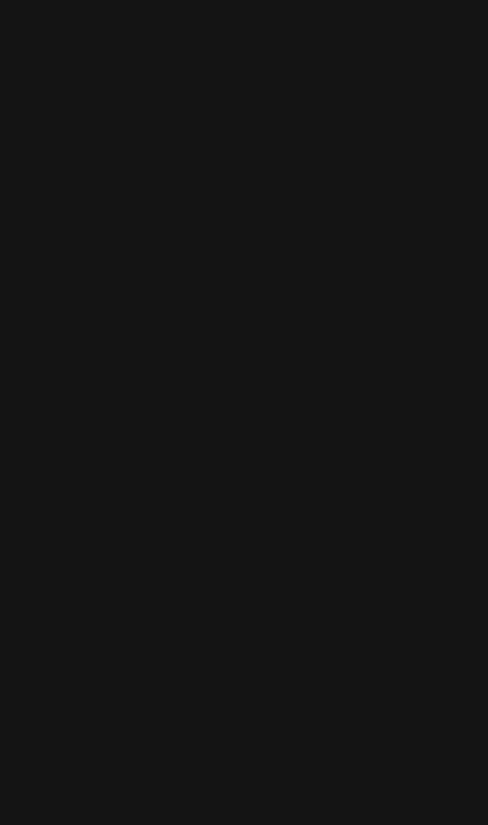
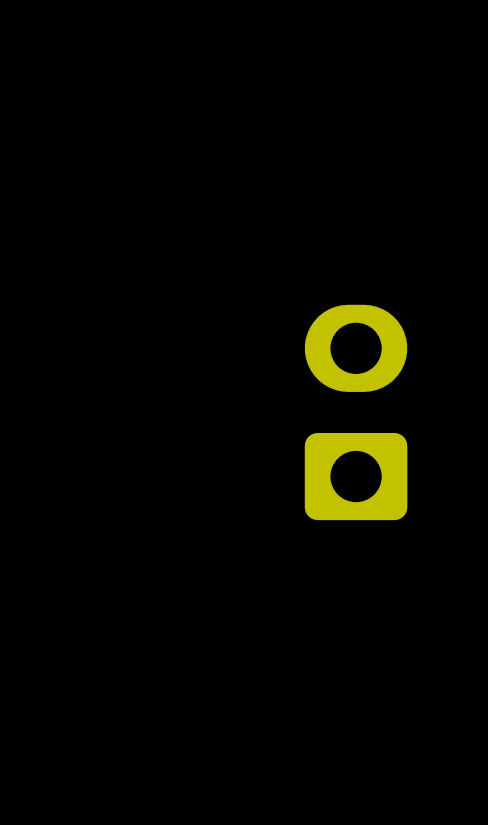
part: none -> (356, 412)

